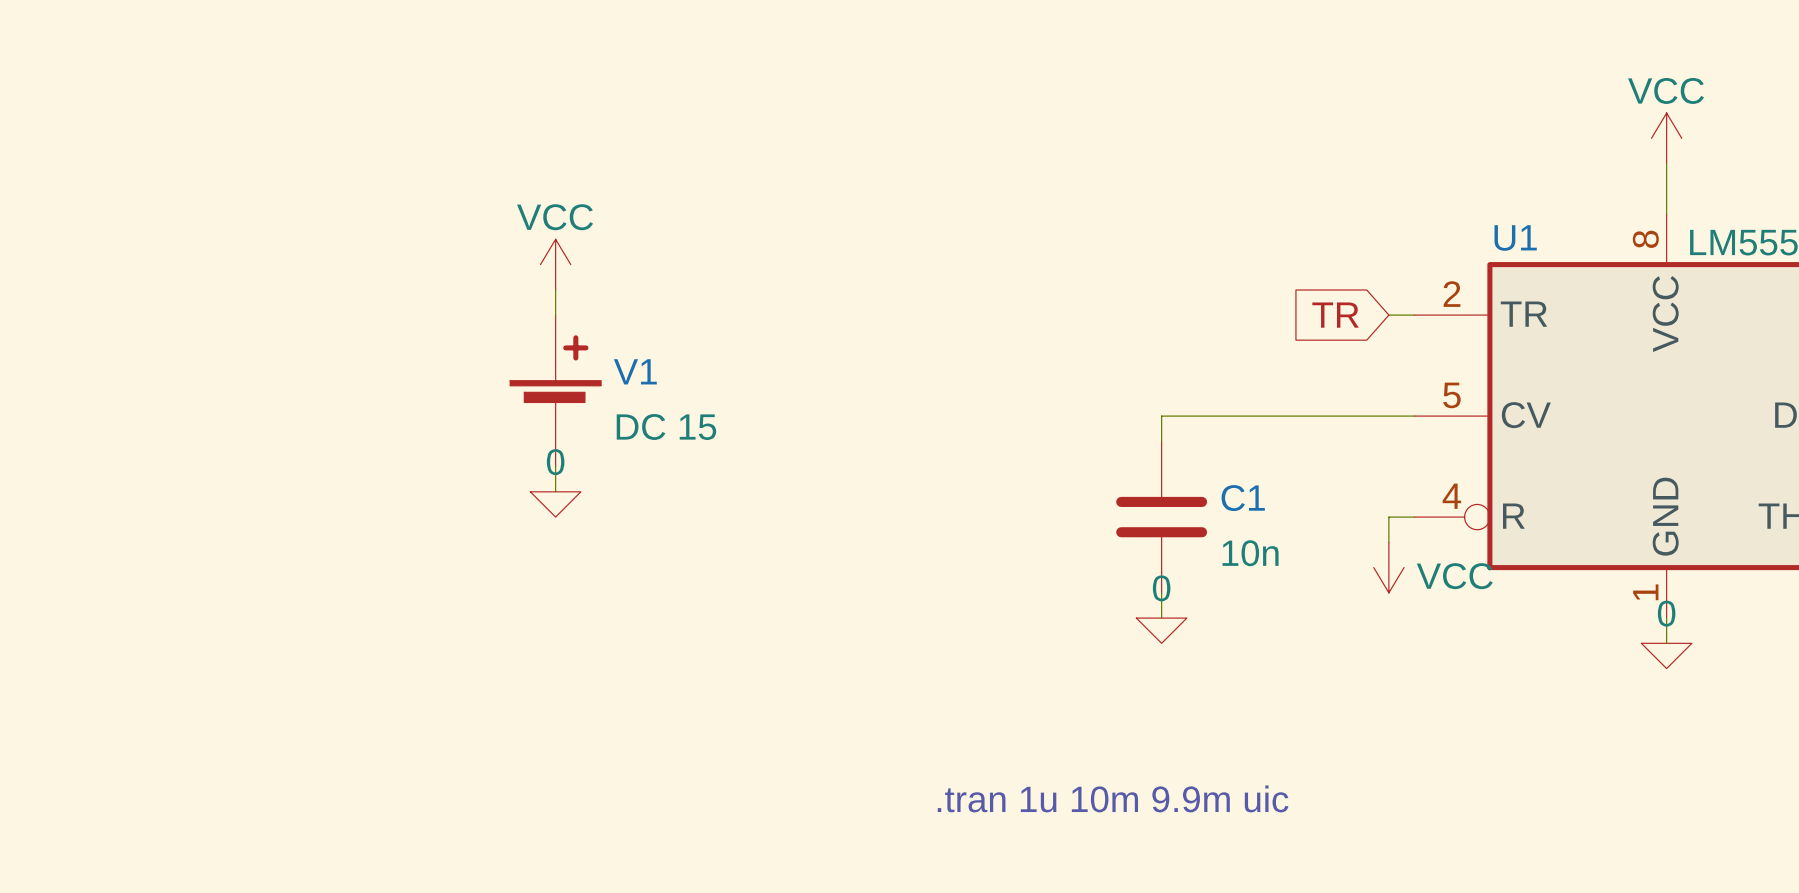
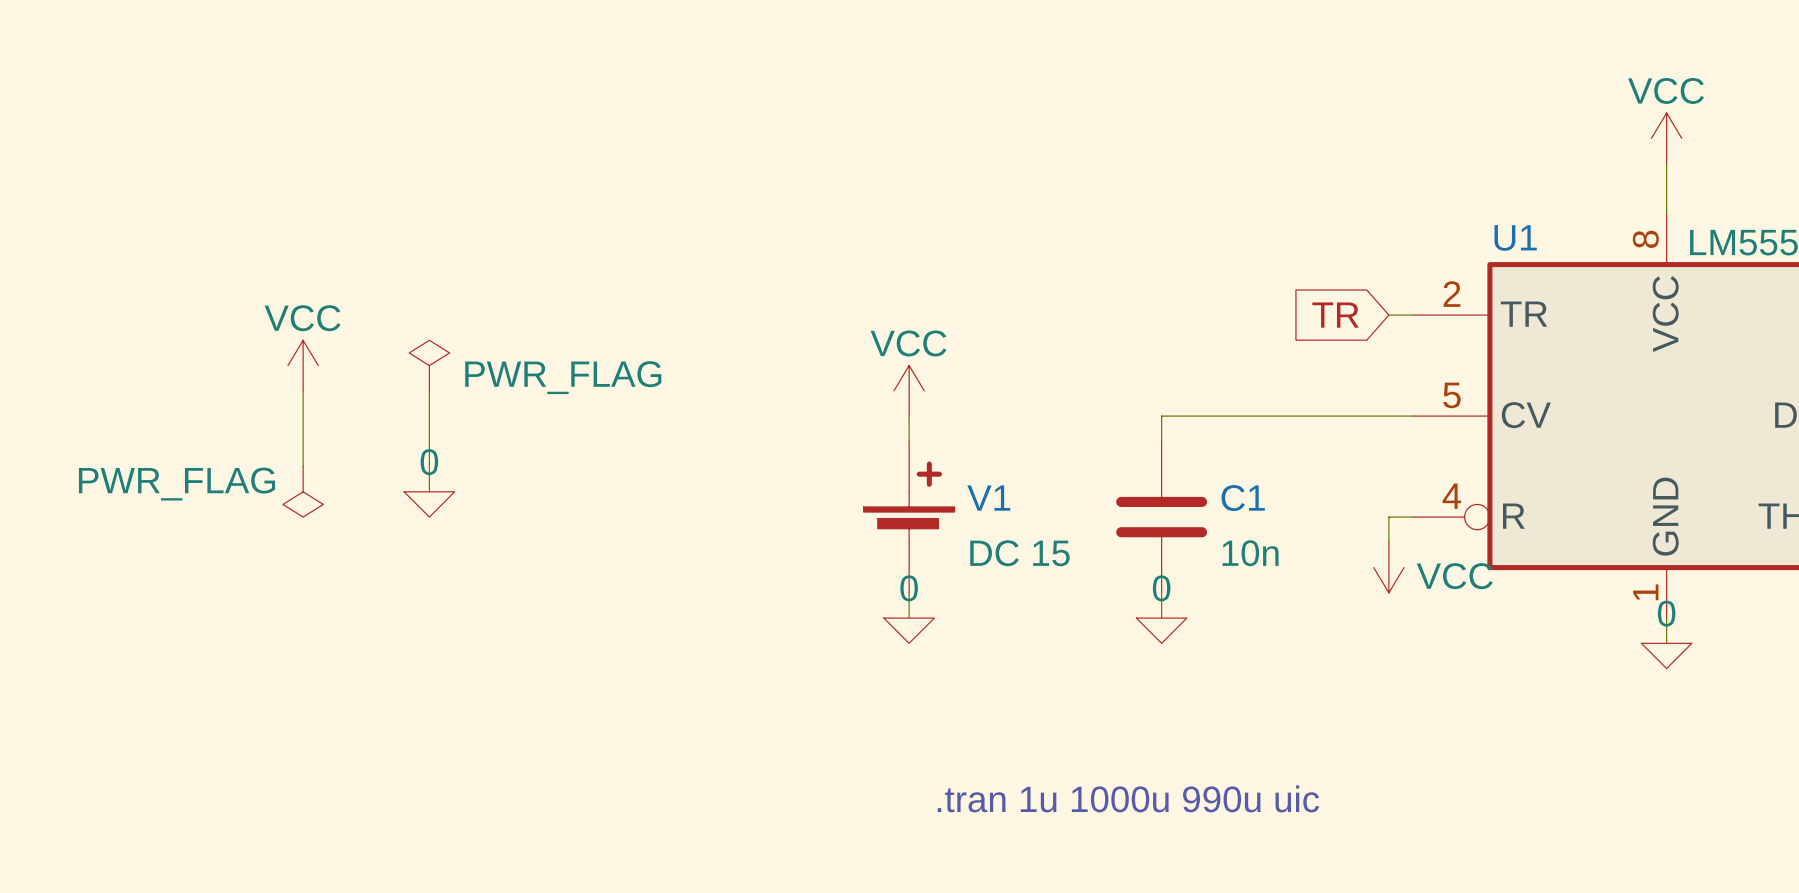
power symbol: VCC (555, 264) -> none
wire: (555, 289) (555, 315) -> (909, 416) (909, 441)
power symbol: none -> VCC (303, 365)
power symbol: none -> PWR_FLAG (429, 365)
wire: none -> (303, 390) (303, 466)
wire: none -> (429, 390) (429, 491)
V1 position: (555, 390) -> (909, 517)
power symbol: none -> VCC (909, 390)
wire: (555, 466) (555, 491) -> (909, 592) (909, 618)
power symbol: none -> PWR_FLAG (303, 491)
power symbol position: 0 (555, 504) -> 0 (429, 504)
power symbol: none -> 0 (909, 630)
text: .tran 1u 10m 9.9m uic (1113, 798) -> .tran 1u 1000u 990u uic (1128, 798)

